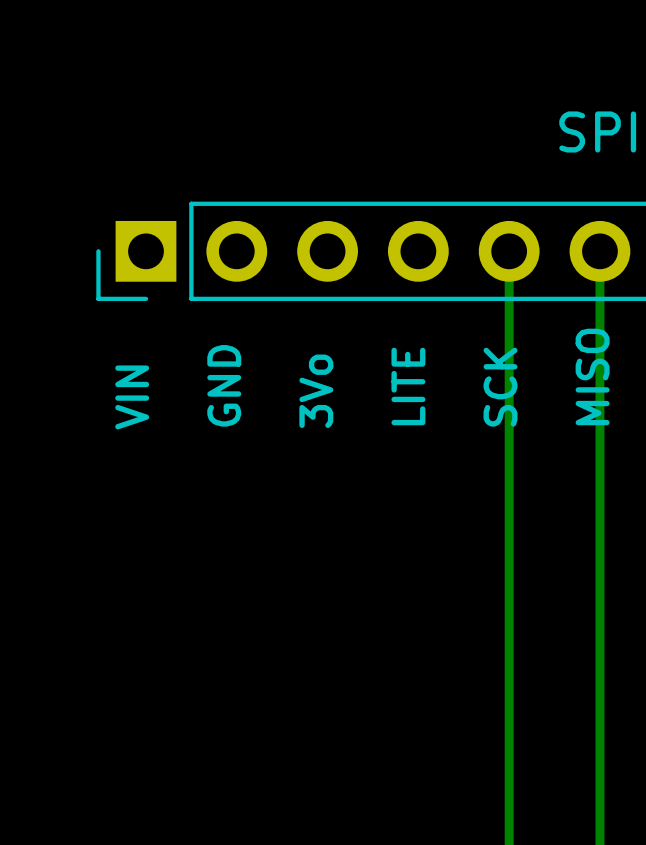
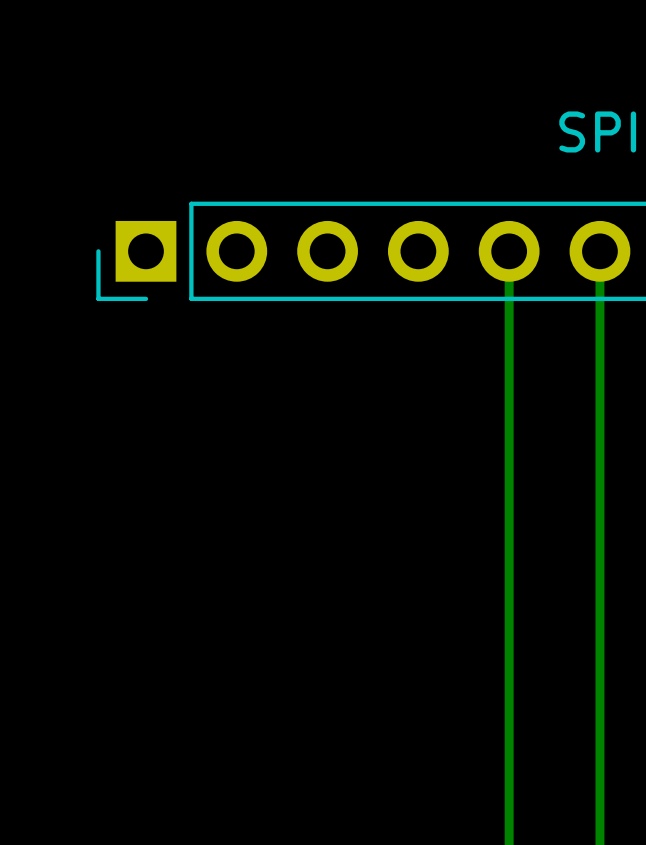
text: MISO (592, 376) -> none
text: GND (224, 385) -> none
text: LITE (408, 386) -> none
text: SCK (500, 387) -> none
text: 3Vo (316, 391) -> none
text: VIN (132, 397) -> none

